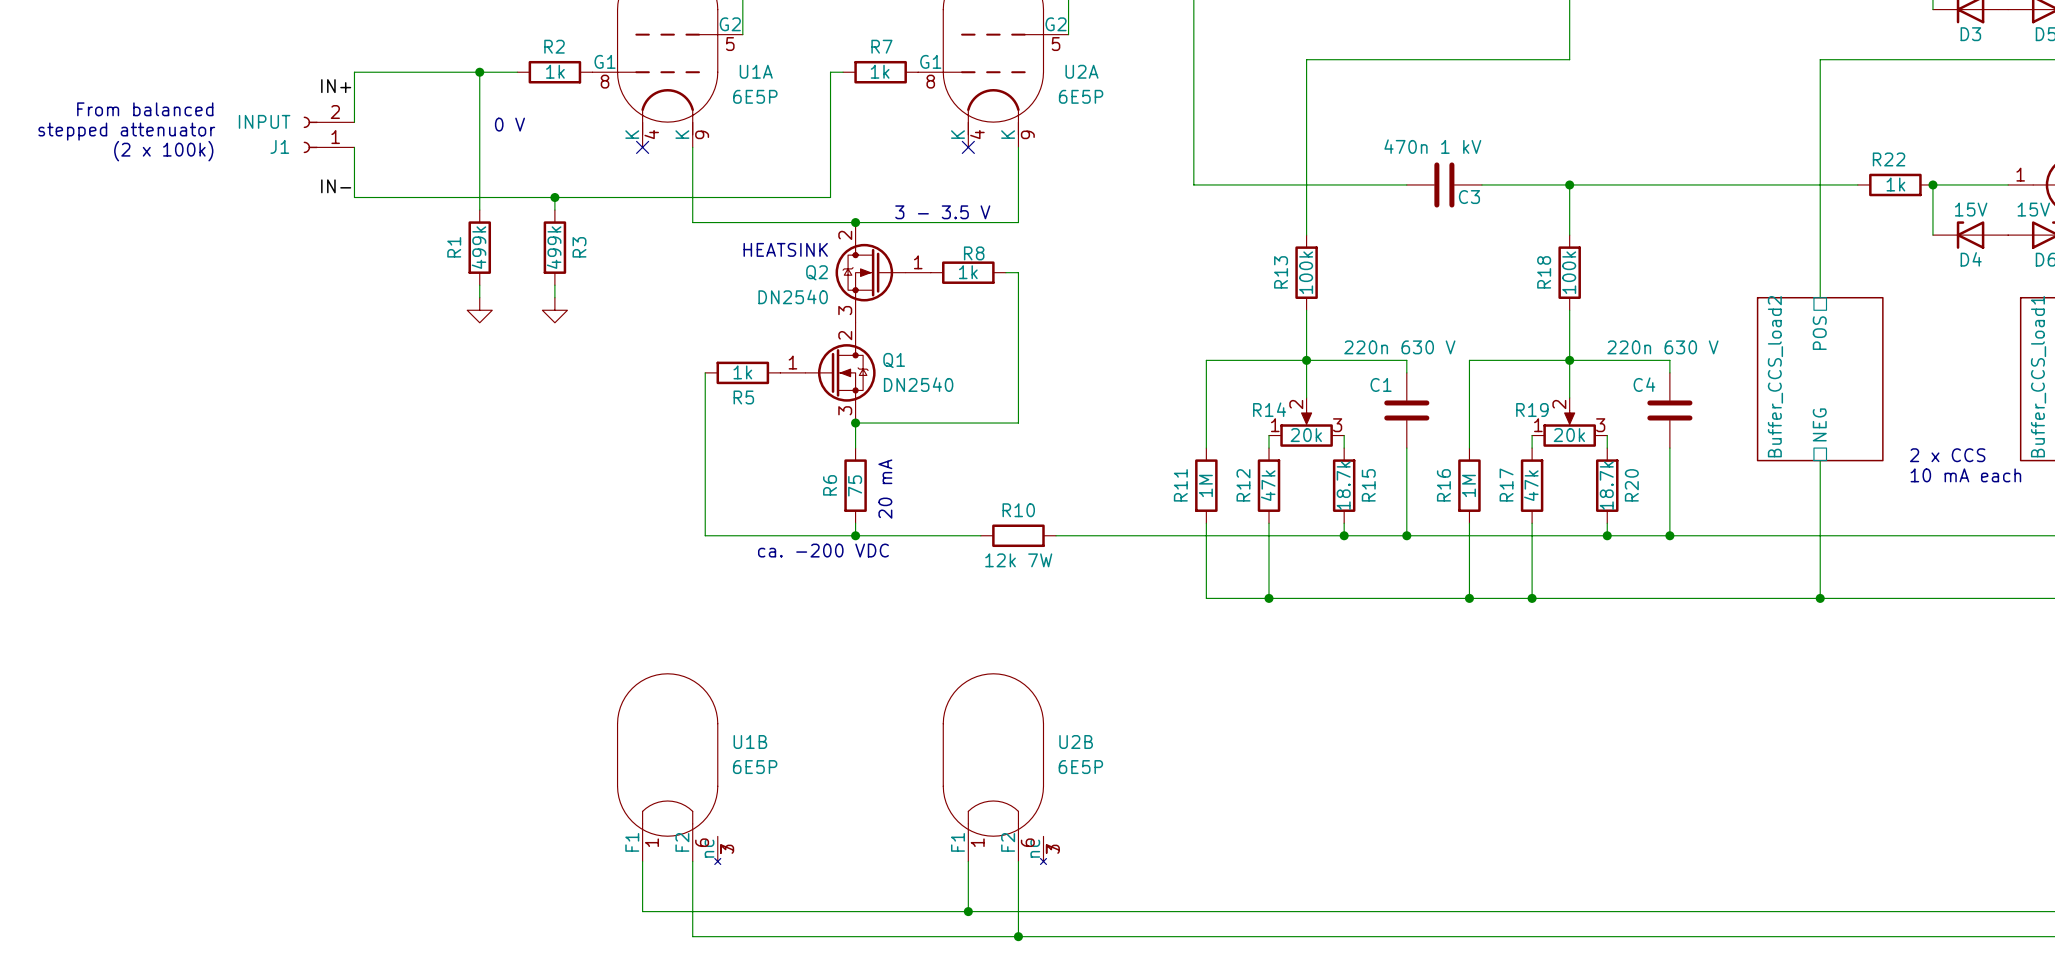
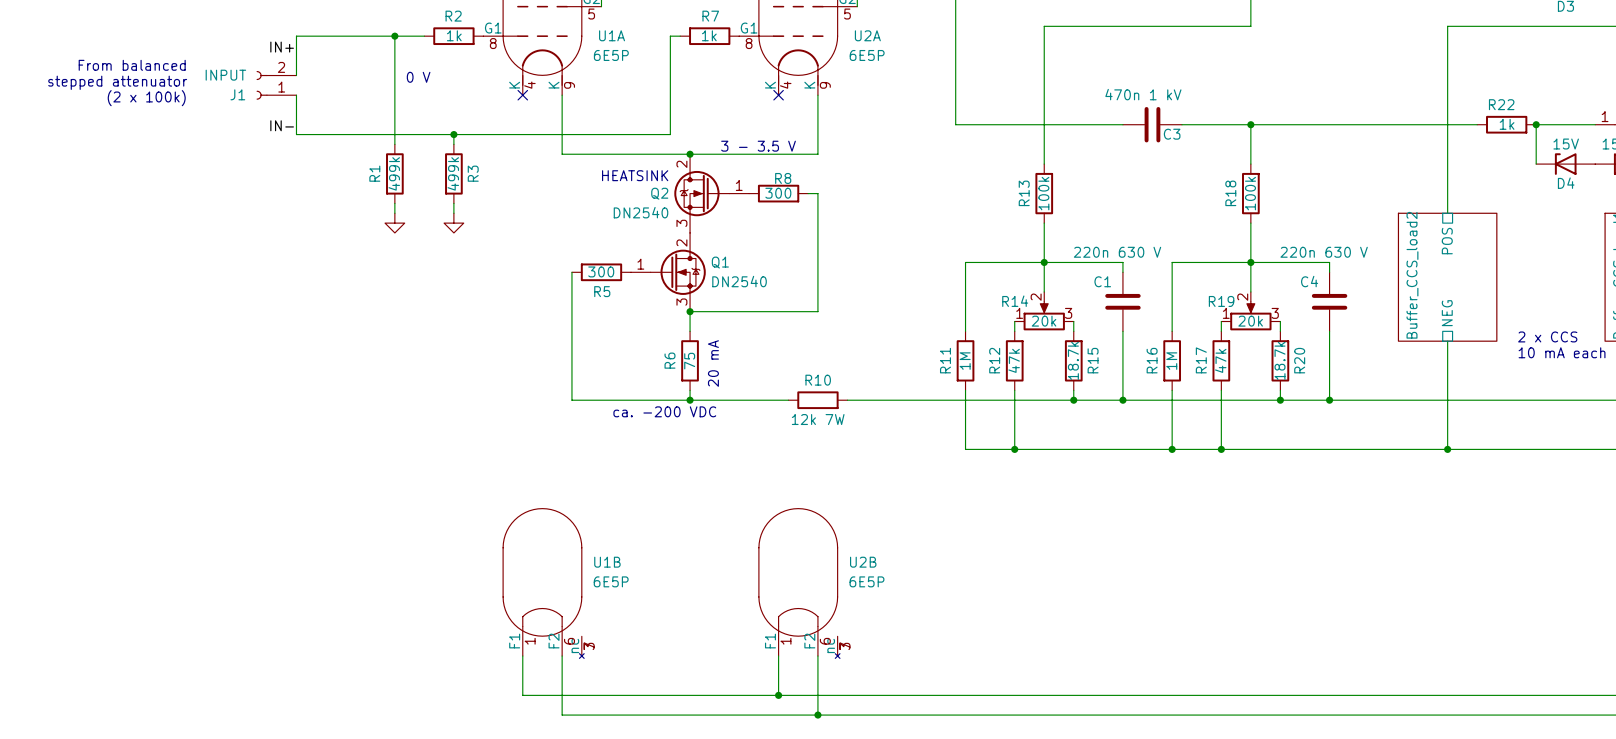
R8 value: 1k (968, 272) -> 300 (778, 193)
R5 value: 1k (742, 372) -> 300 (601, 271)

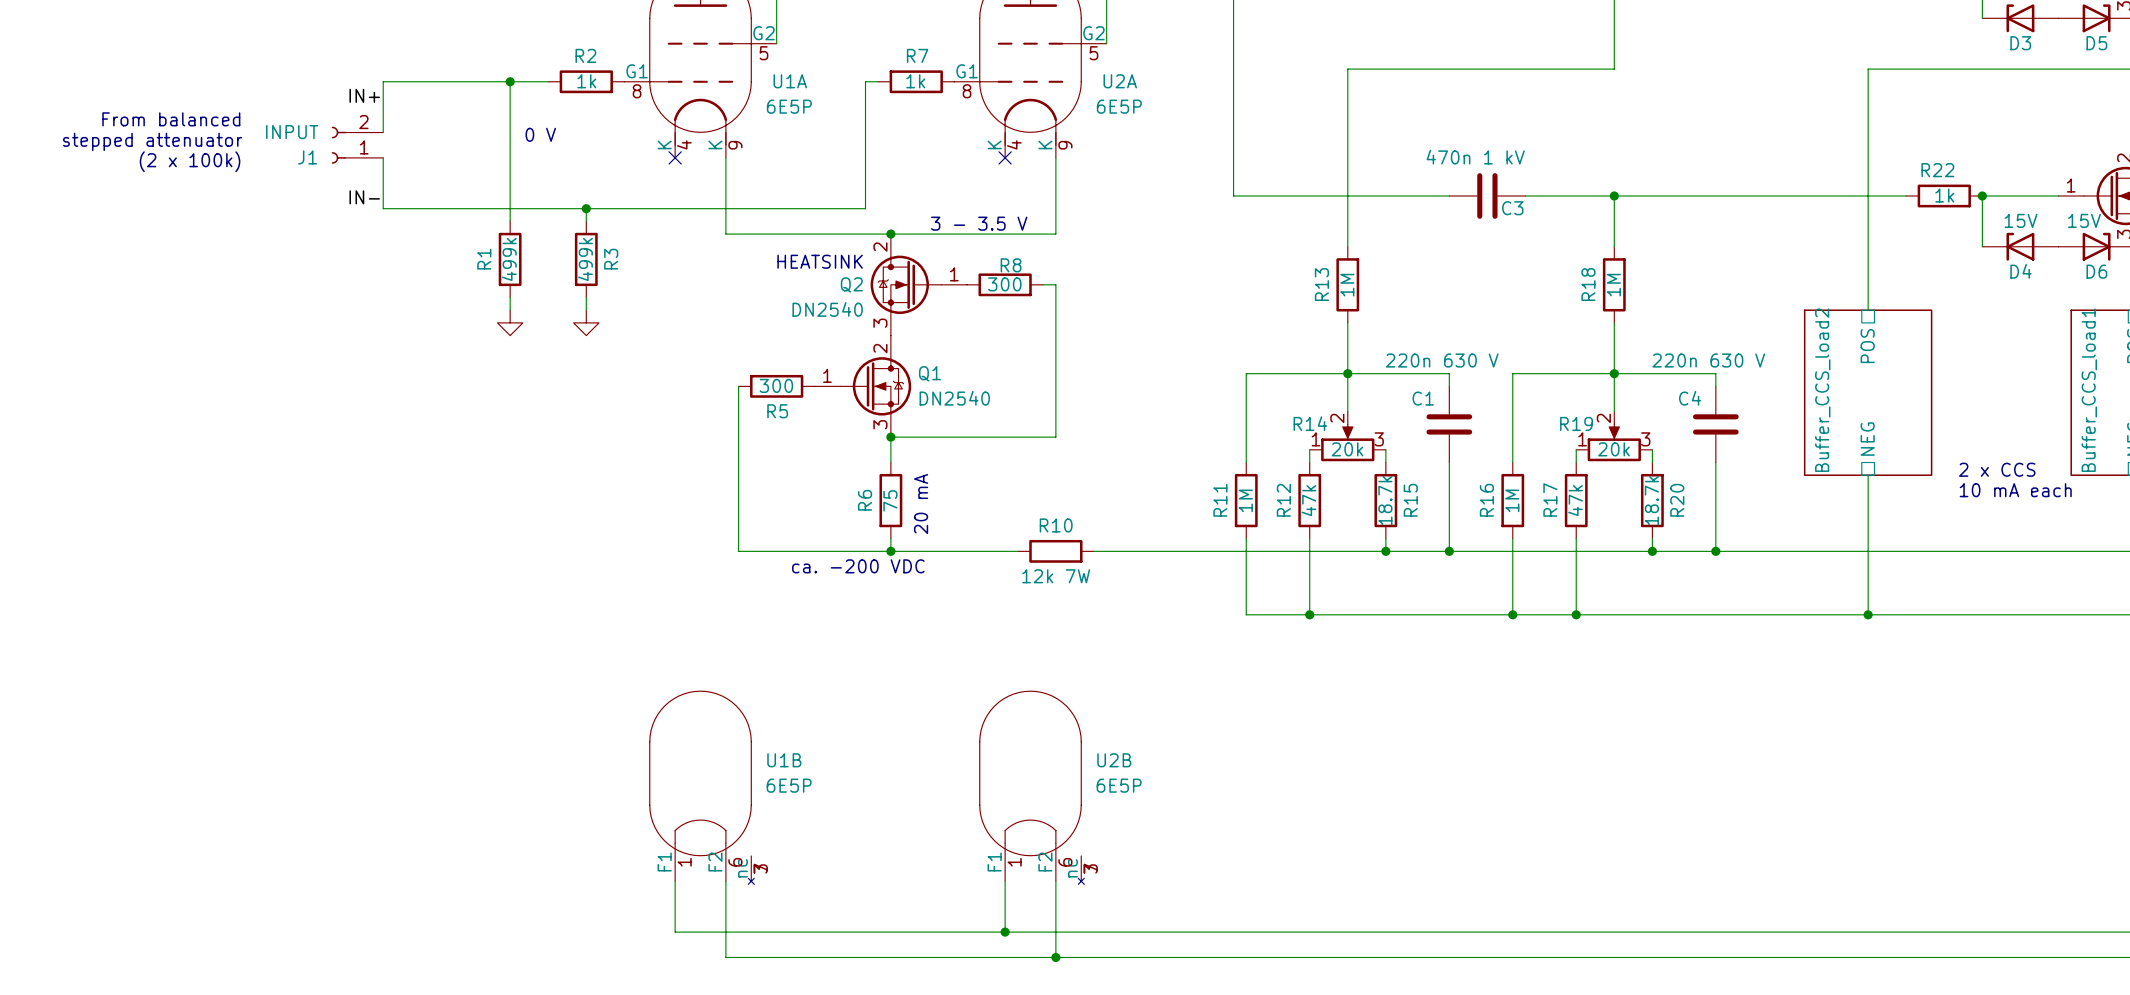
R13 value: 100k (1043, 193) -> 1M (1347, 285)
R18 value: 100k (1250, 193) -> 1M (1613, 285)

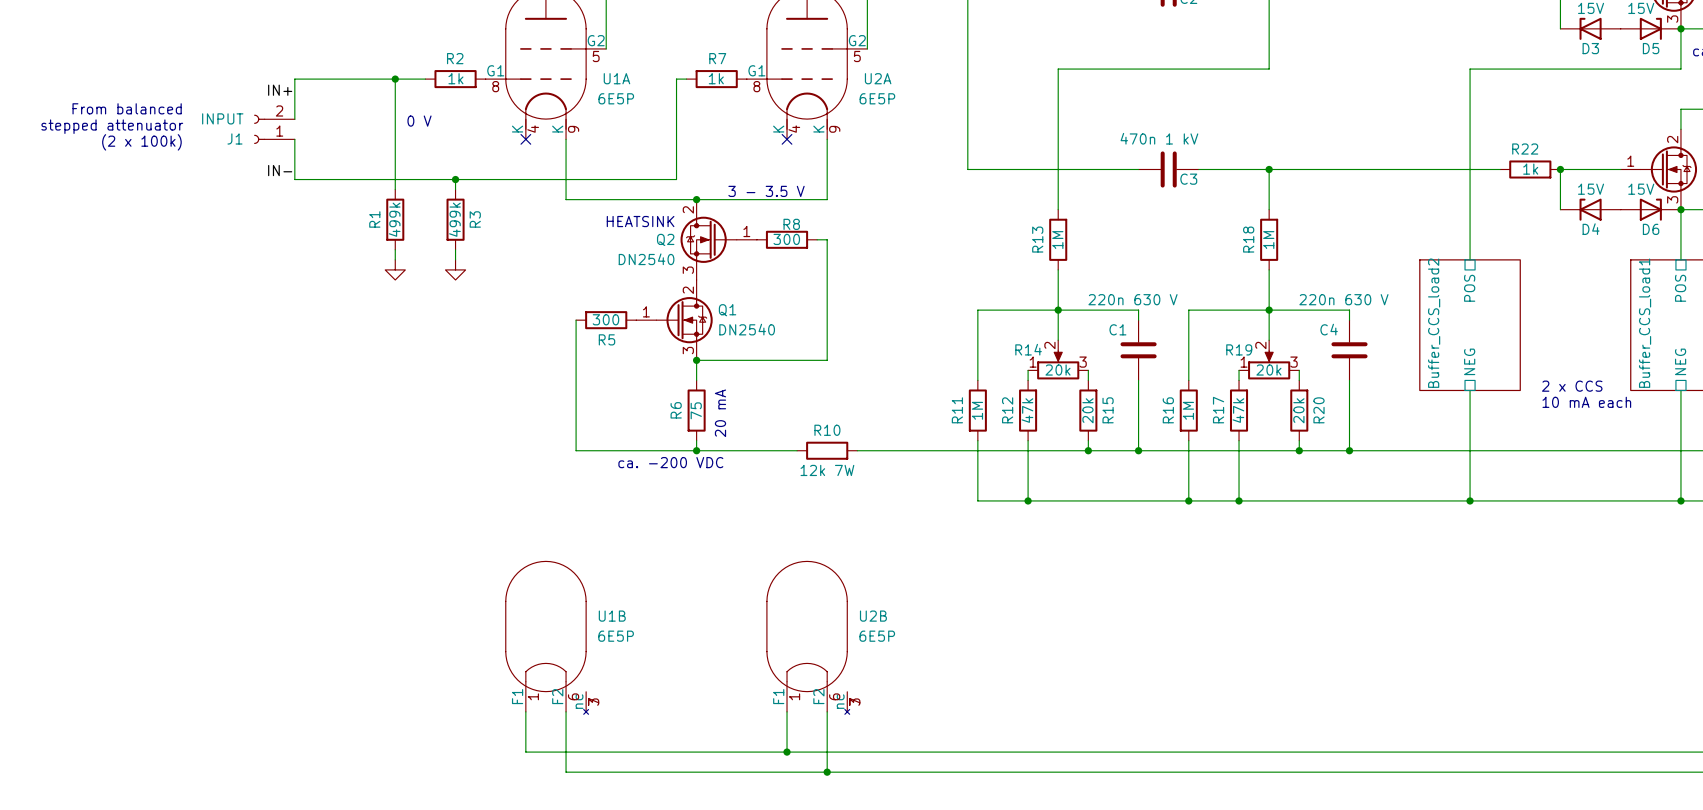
R15 value: 18.7k (1385, 500) -> 20k (1087, 410)
R20 value: 18.7k (1651, 500) -> 20k (1298, 410)

